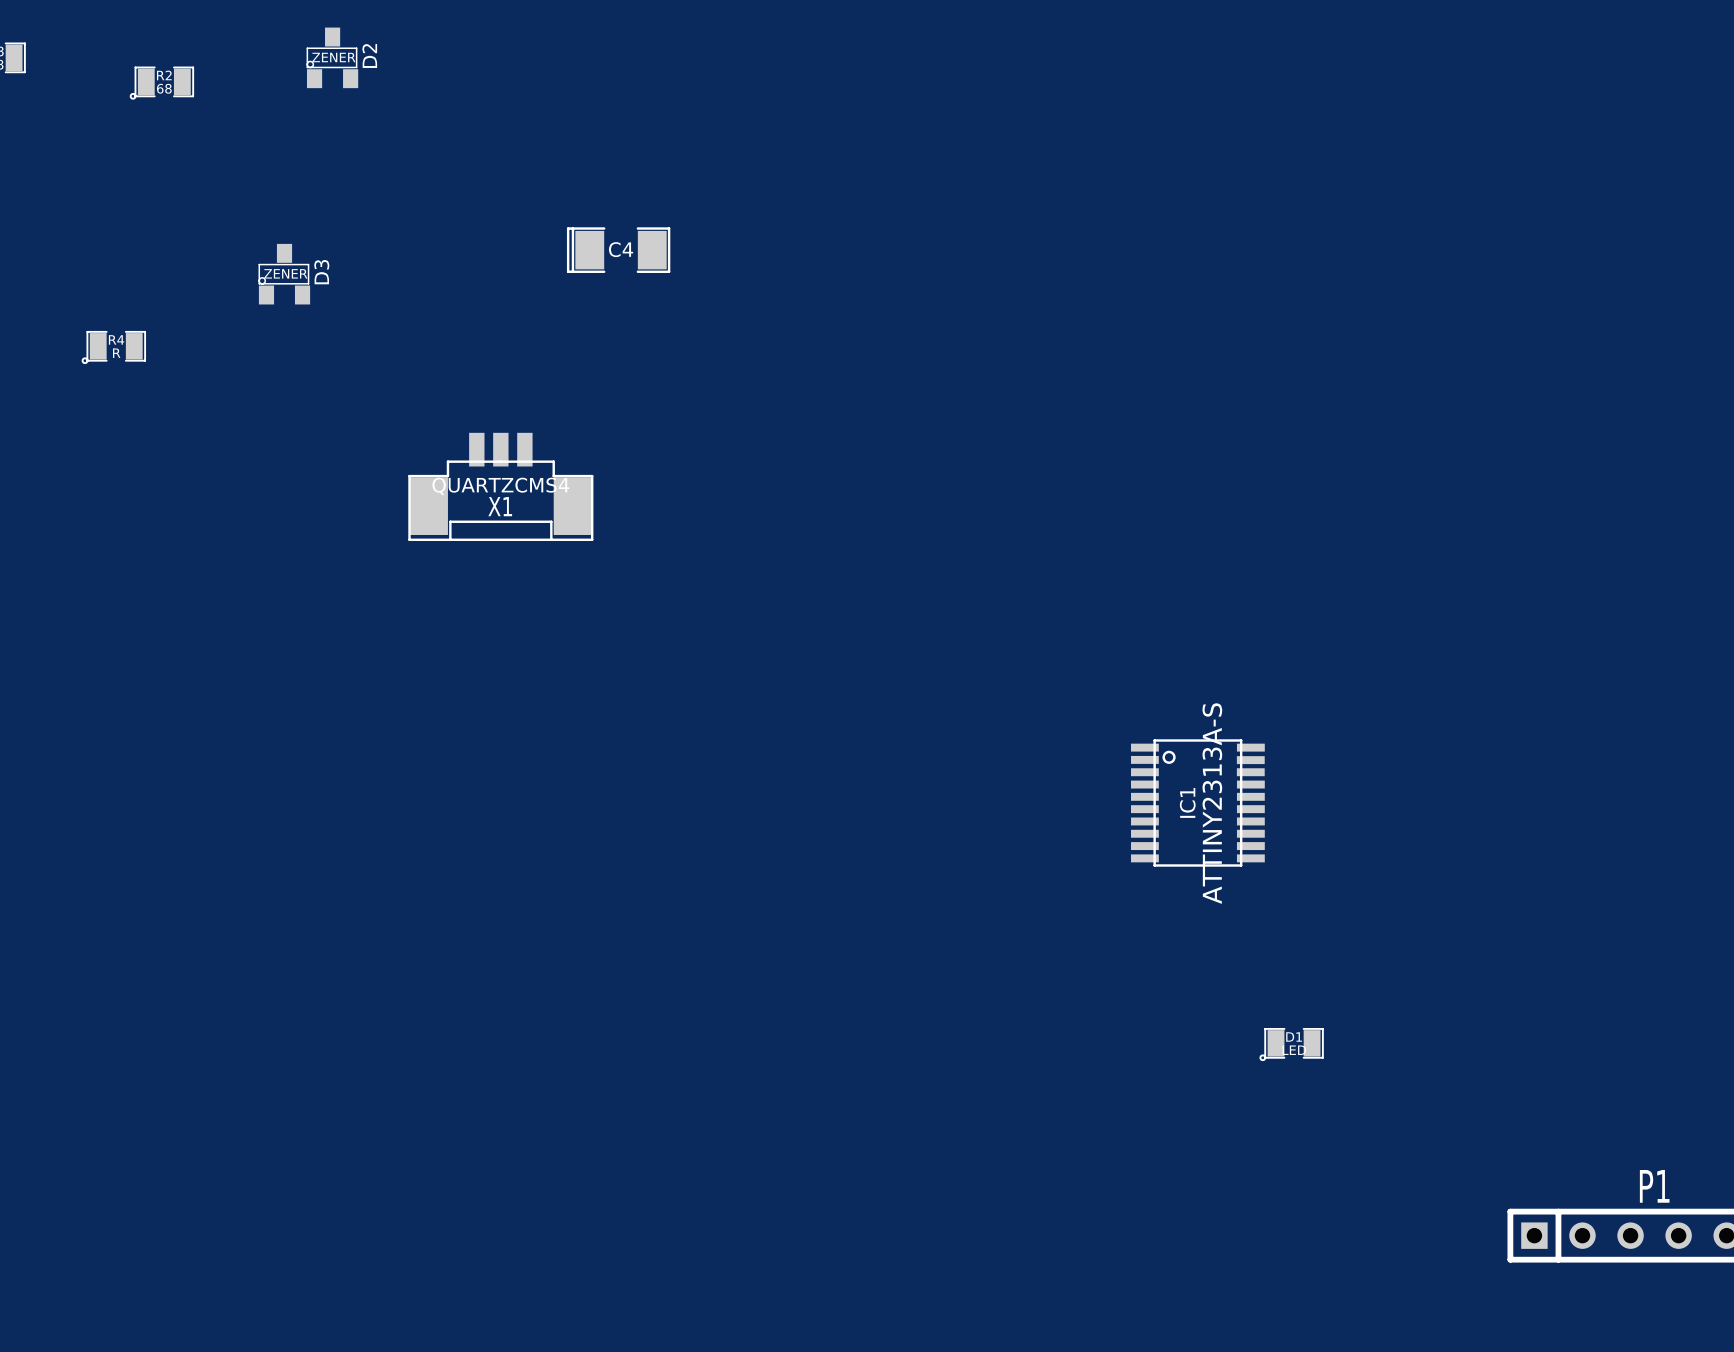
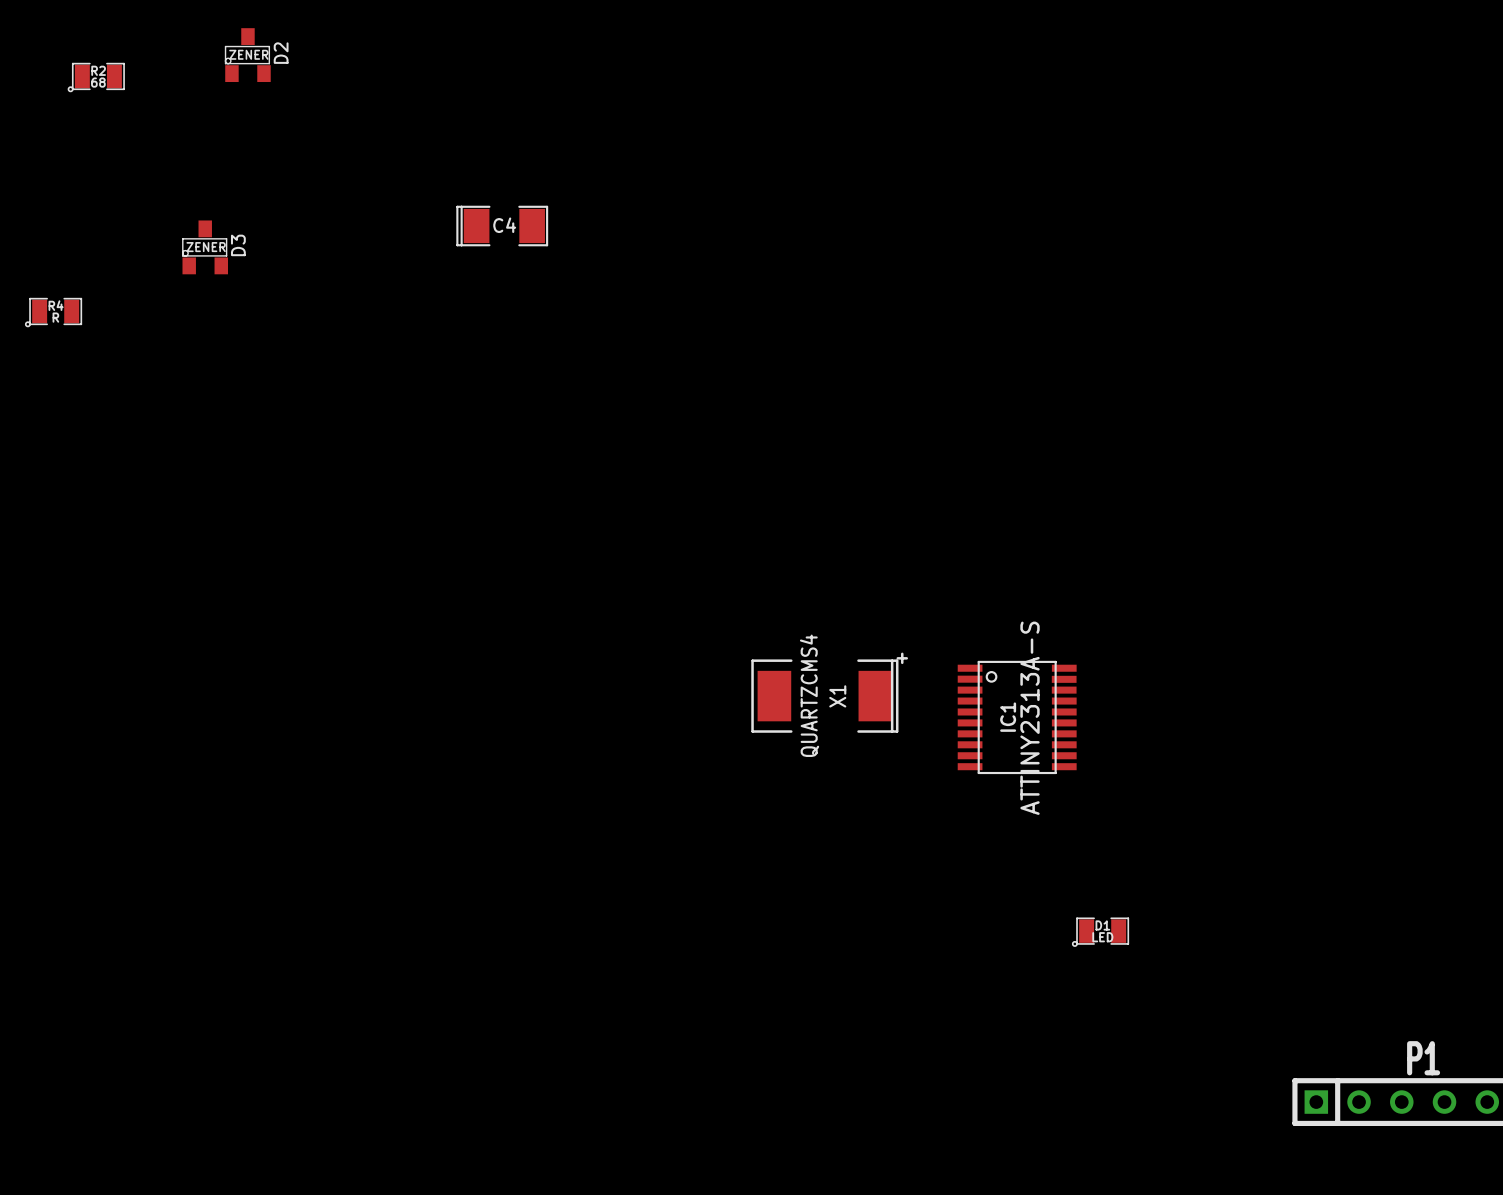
X1 footprint: [408, 432, 594, 541] -> [751, 659, 899, 733]

